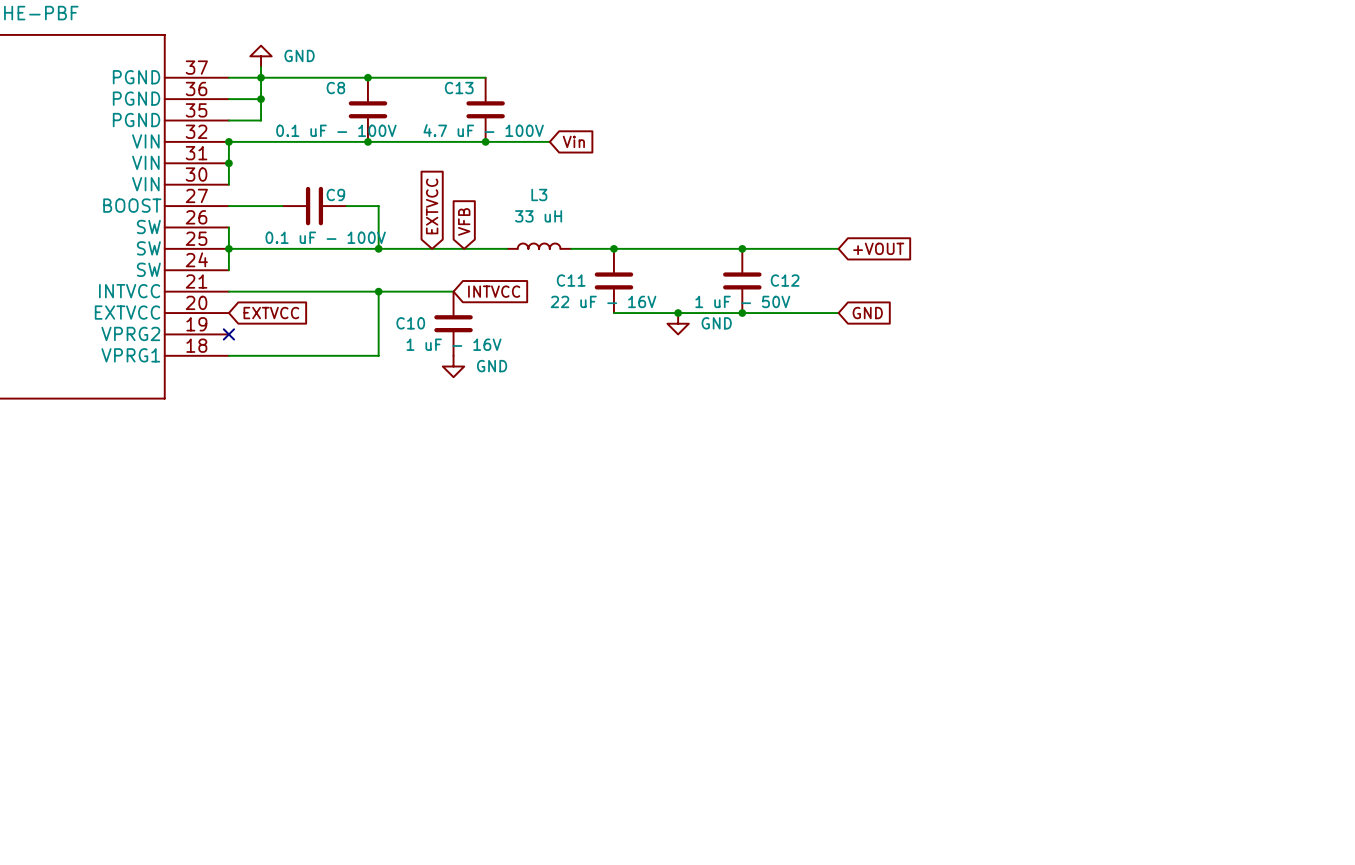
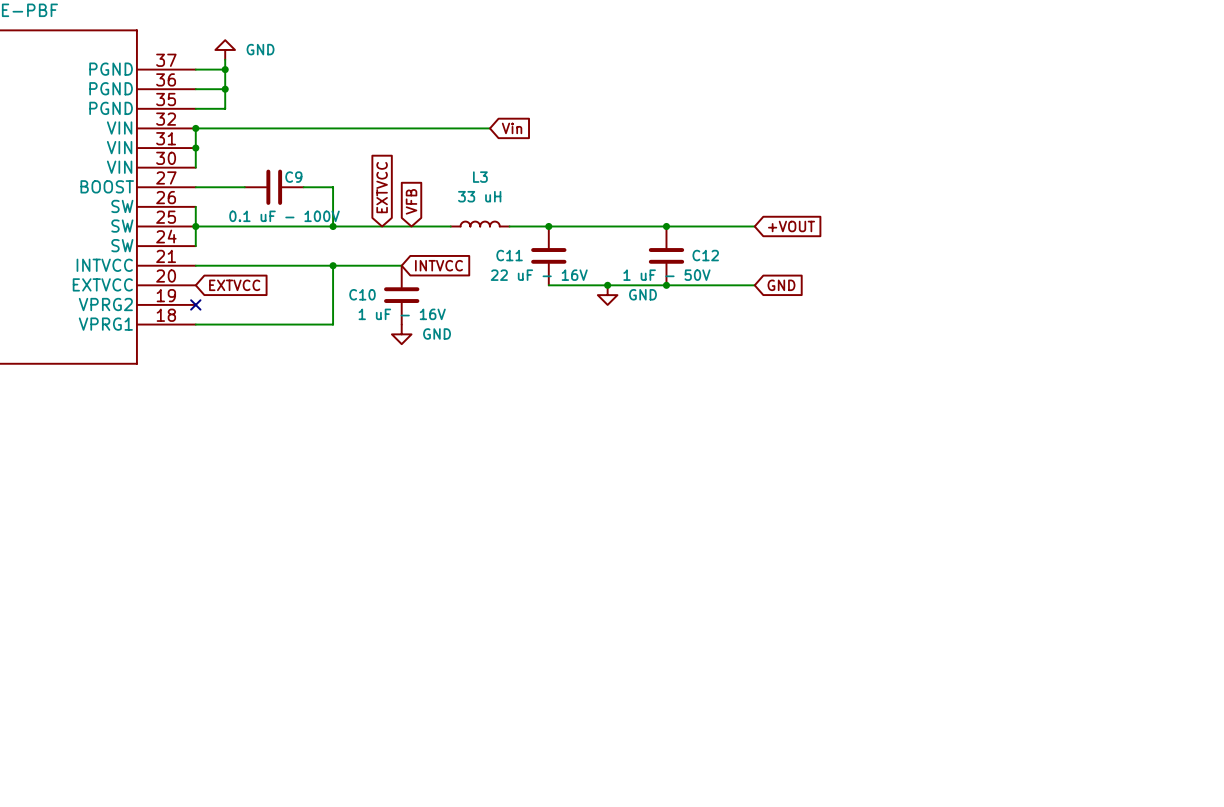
wire: (261, 77) (485, 77) -> none
junction: (367, 77) -> none
C8: 0.1 uF - 100V (367, 109) -> none
C13: 4.7 uF - 100V (485, 109) -> none
junction: (367, 141) -> none
junction: (485, 141) -> none

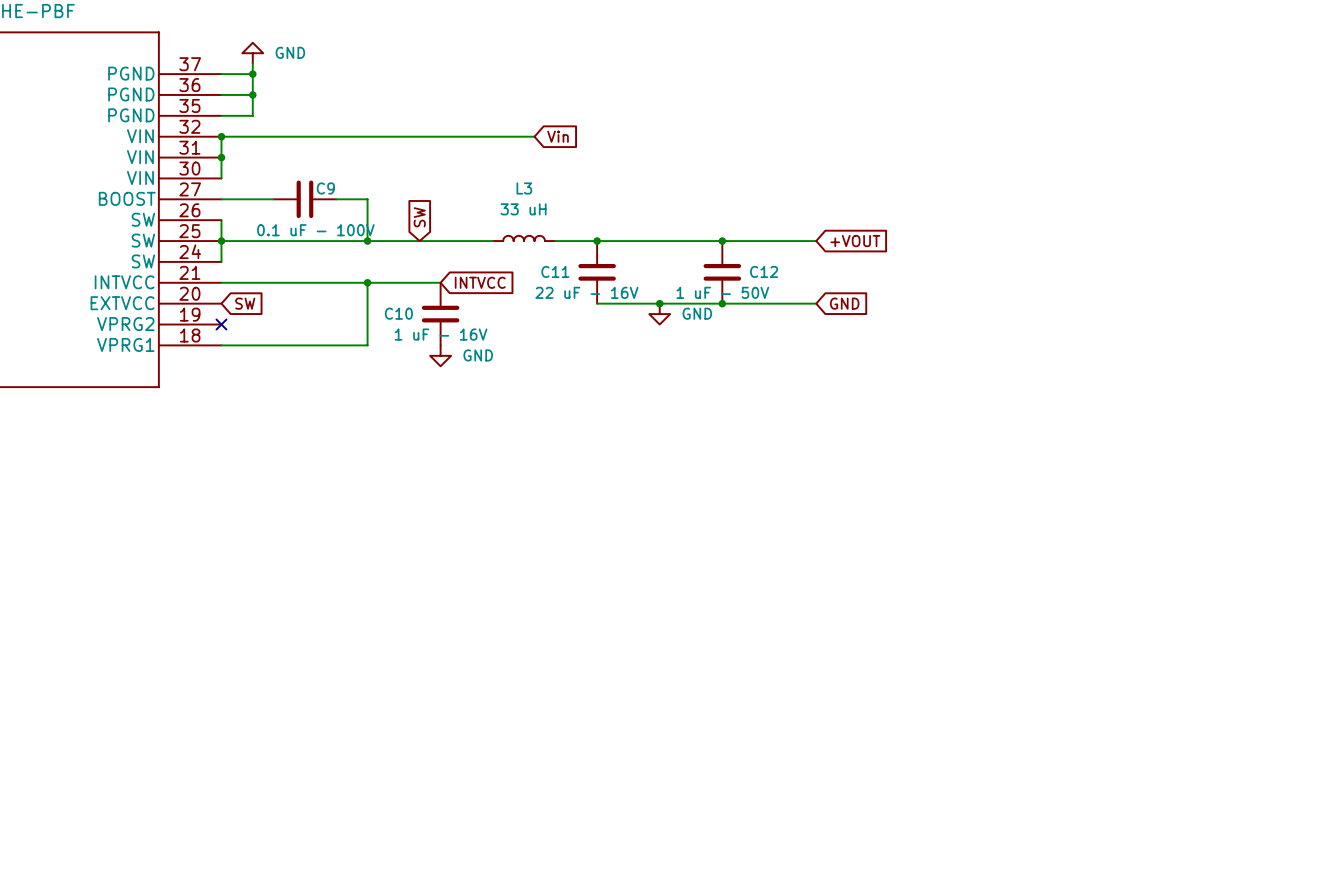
global label: EXTVCC (382, 187) -> SW (419, 217)
global label: VFB (411, 201) -> none
global label: EXTVCC (234, 285) -> SW (245, 303)

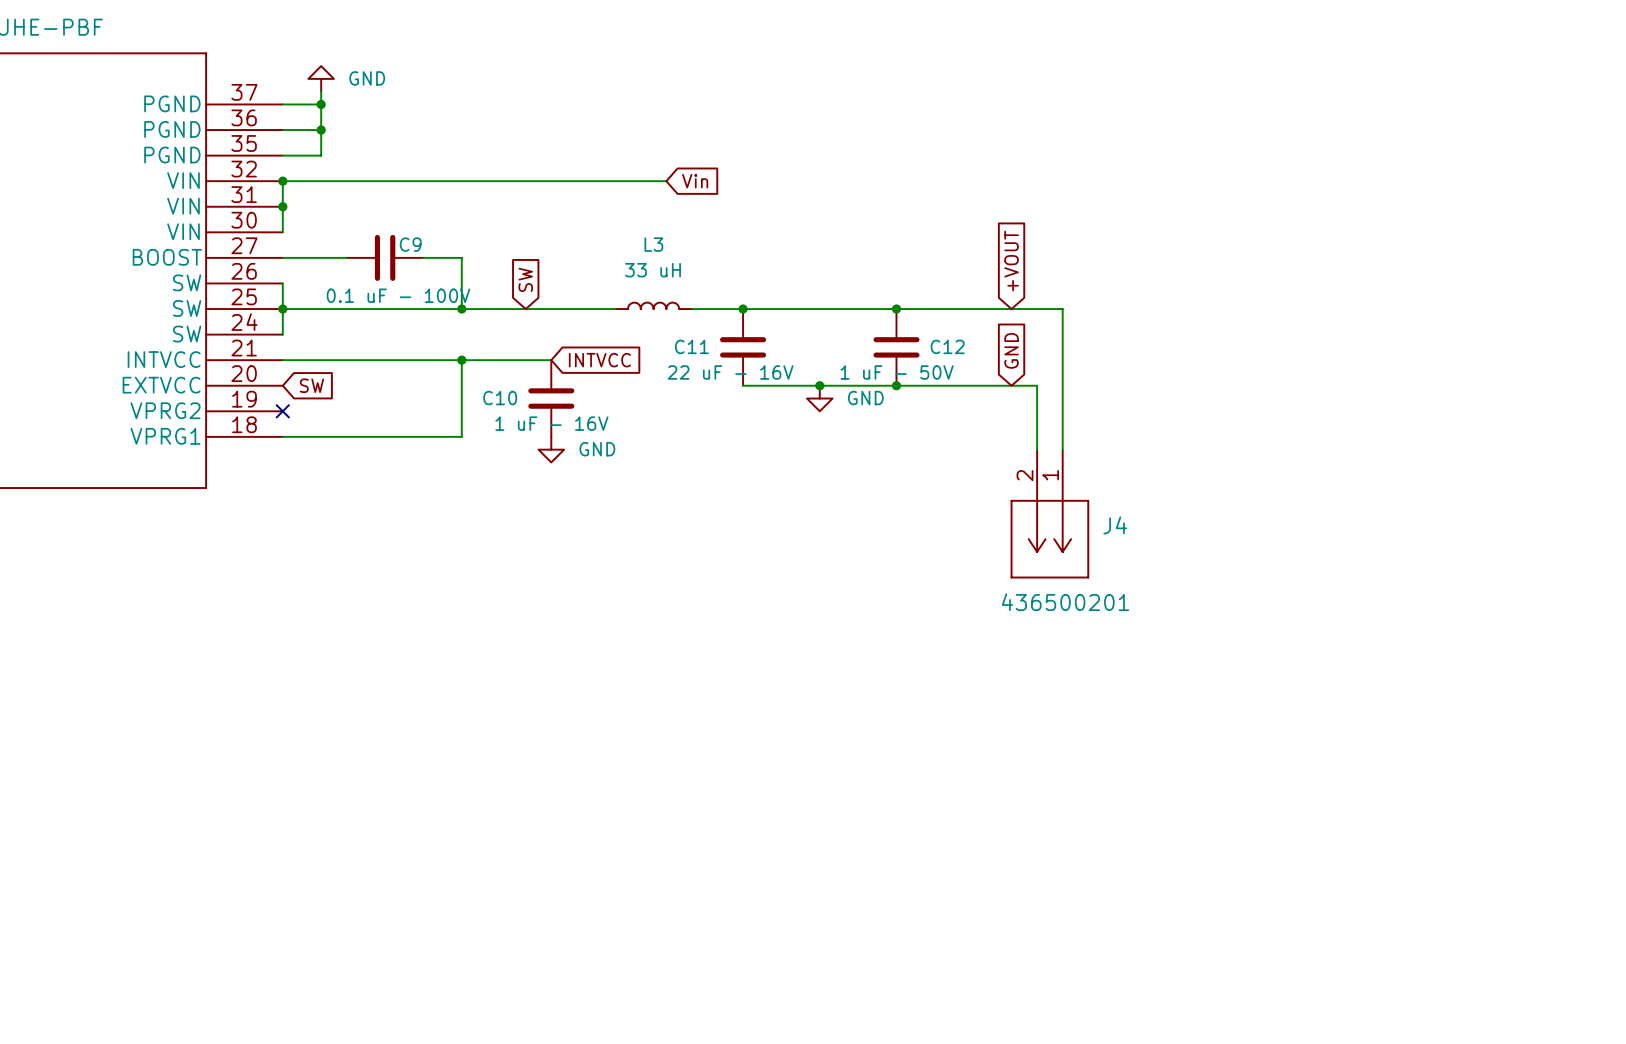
wire: none -> (1011, 309) (1062, 309) (1062, 449)
global label rotation: 0° (855, 241) -> 90° counterclockwise (1011, 261)
wire: none -> (1011, 385) (1037, 385) (1037, 449)
global label rotation: 0° (844, 303) -> 90° counterclockwise (1011, 350)
J4: none -> 436500201 (1049, 513)

